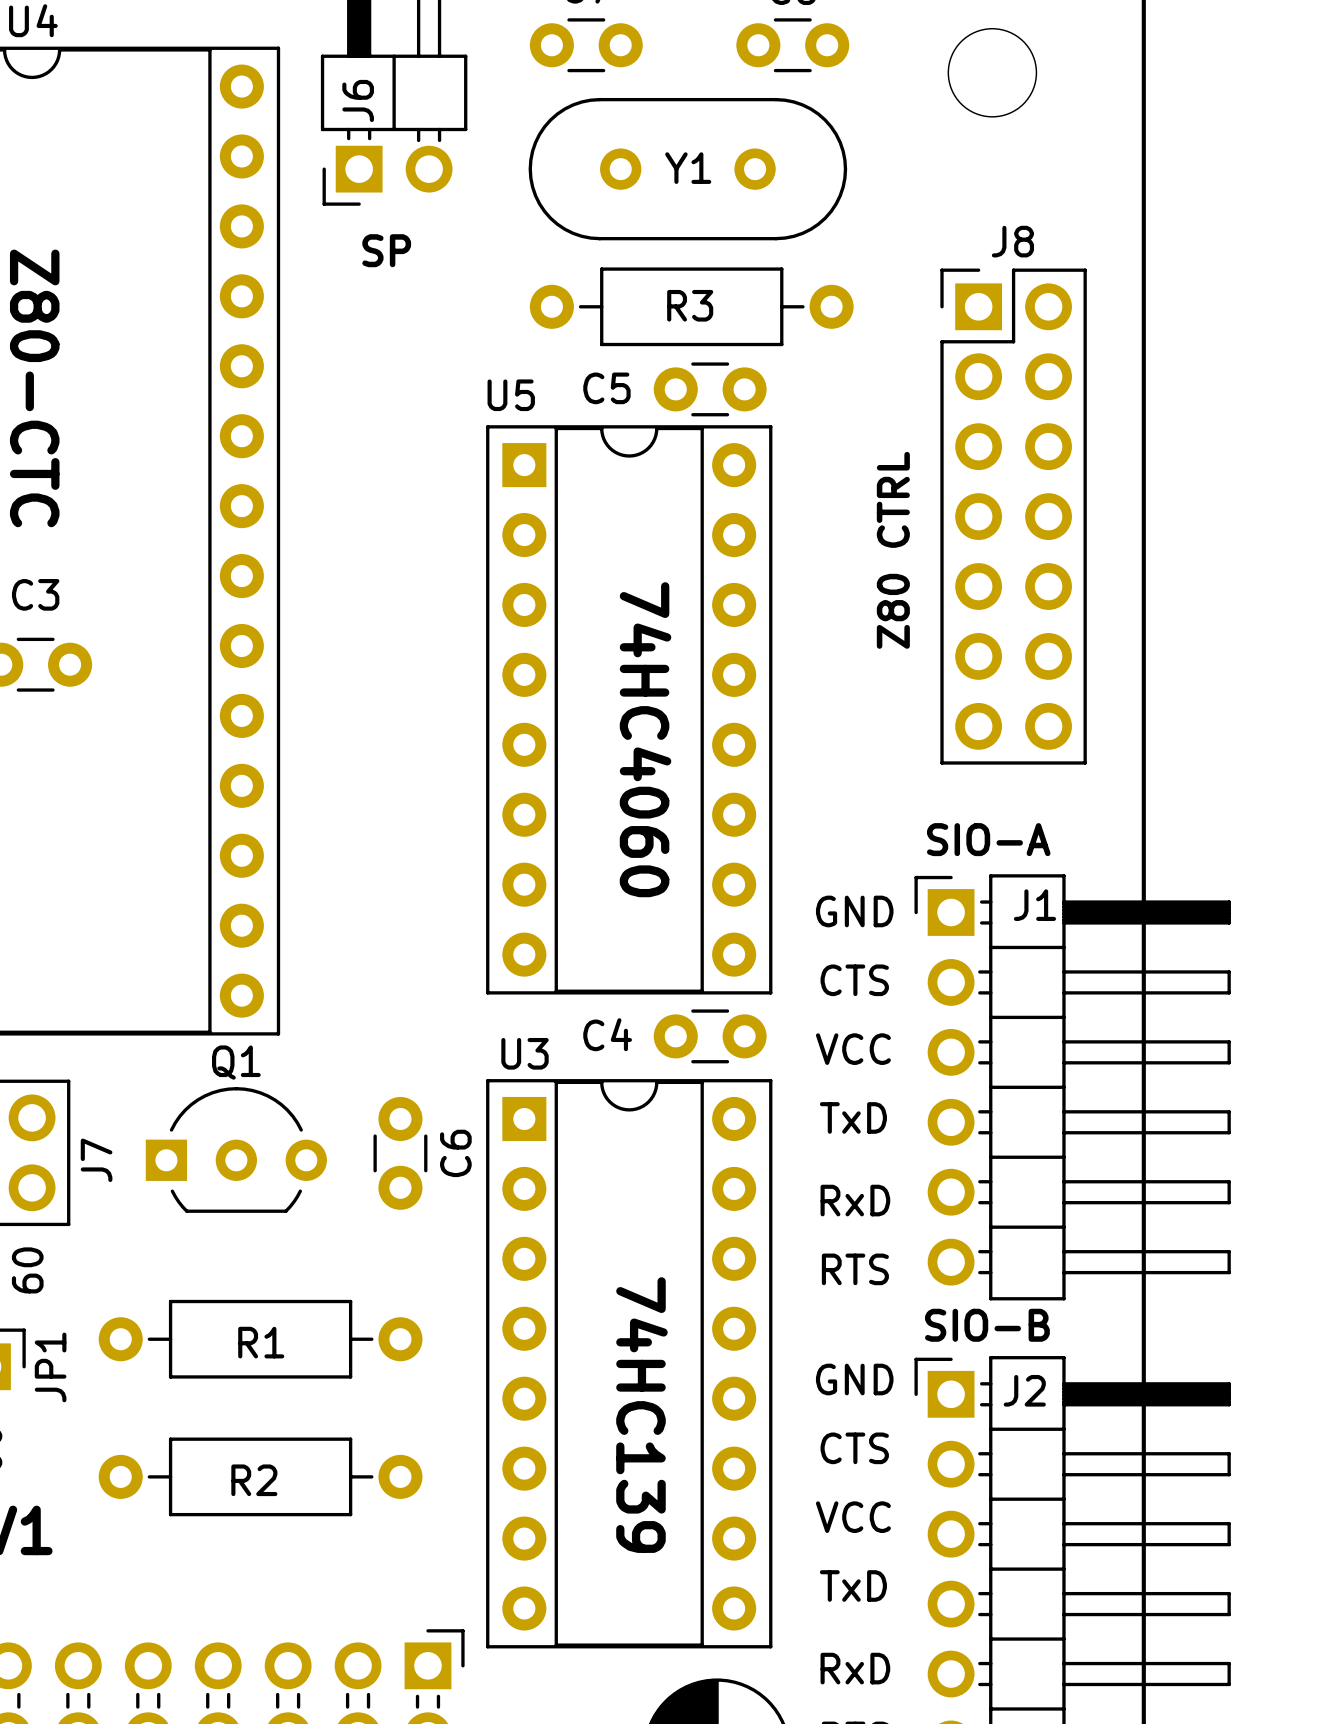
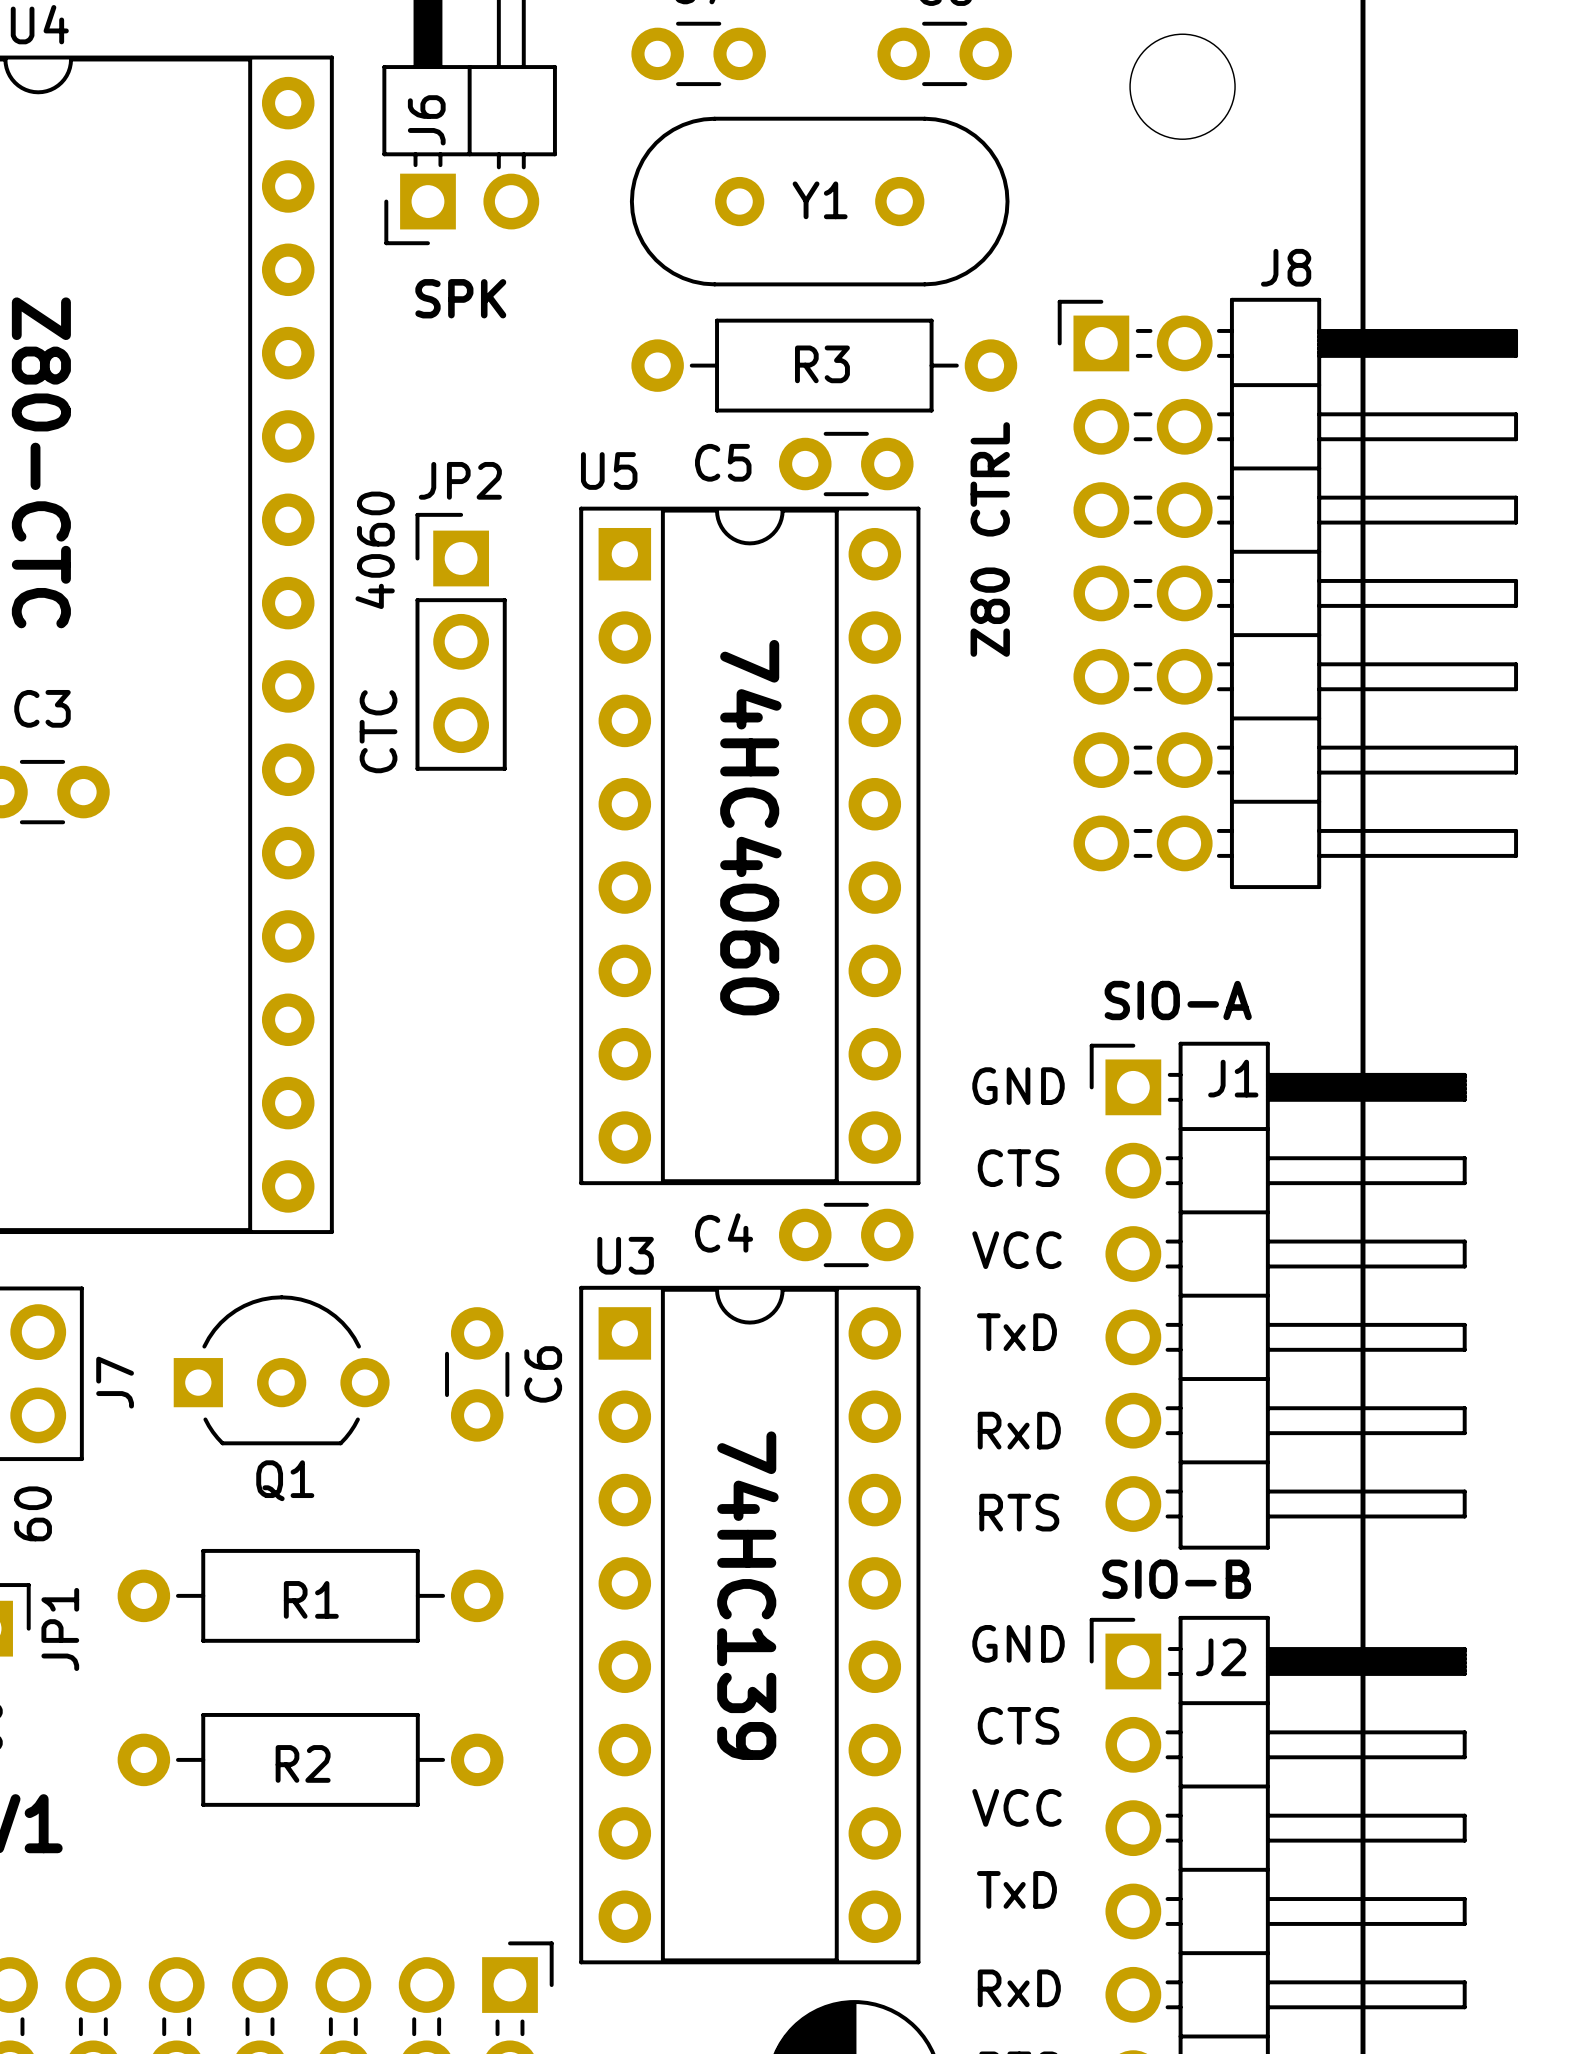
text: SP (386, 250) -> SPK (460, 298)
J8 footprint: [940, 268, 1087, 765] -> [1057, 297, 1519, 890]
text: none -> 4060 (375, 550)
JP2: none -> (461, 641)
text position: Z80 CTRL (893, 550) -> Z80 CTRL (990, 539)
text: none -> CTC (378, 731)
text position: 74HC4060 (645, 739) -> 74HC4060 (750, 827)
Q1 name position: Q1 (236, 1062) -> Q1 (285, 1480)
text position: 74HC139 (641, 1415) -> 74HC139 (747, 1595)

